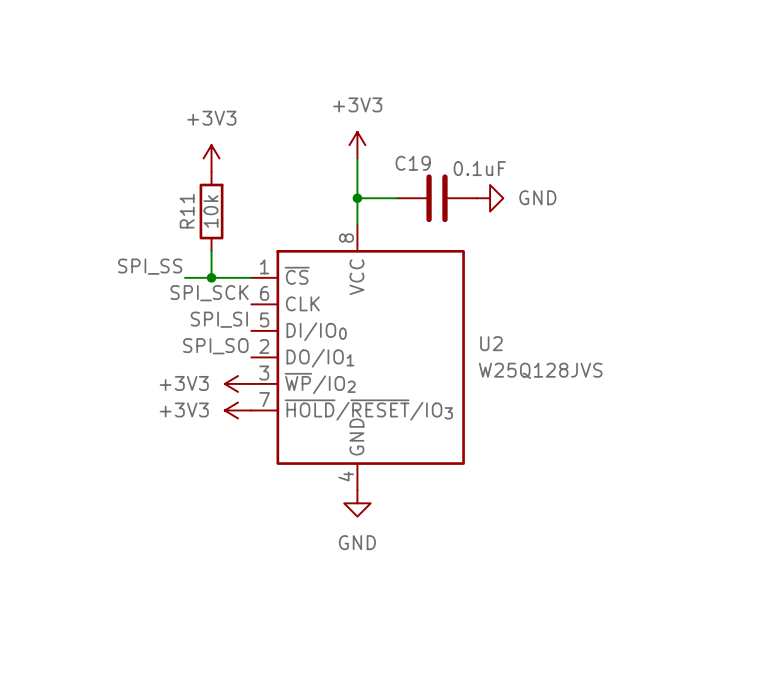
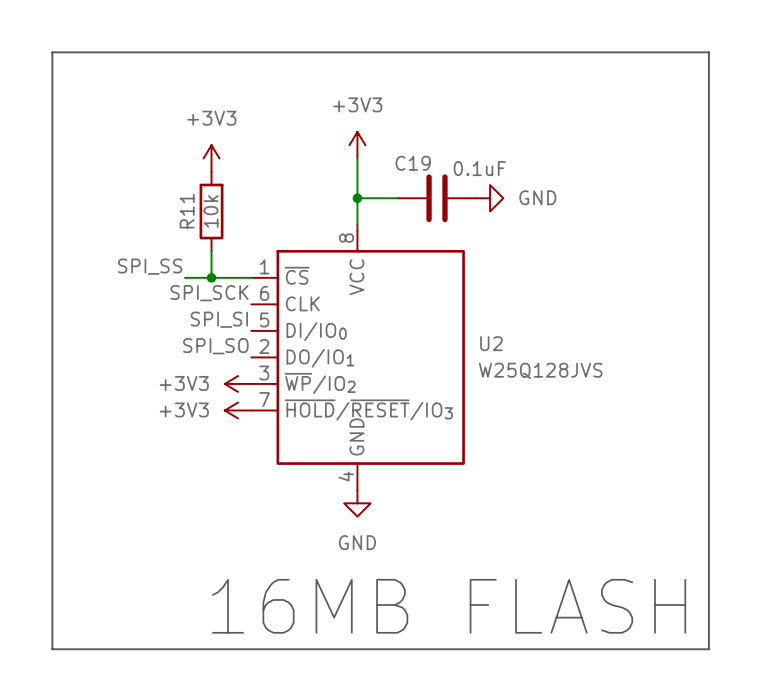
line: none -> (52, 52) (708, 52) (708, 649) (52, 649) (52, 52)
text: none -> 16MB FLASH (449, 606)

